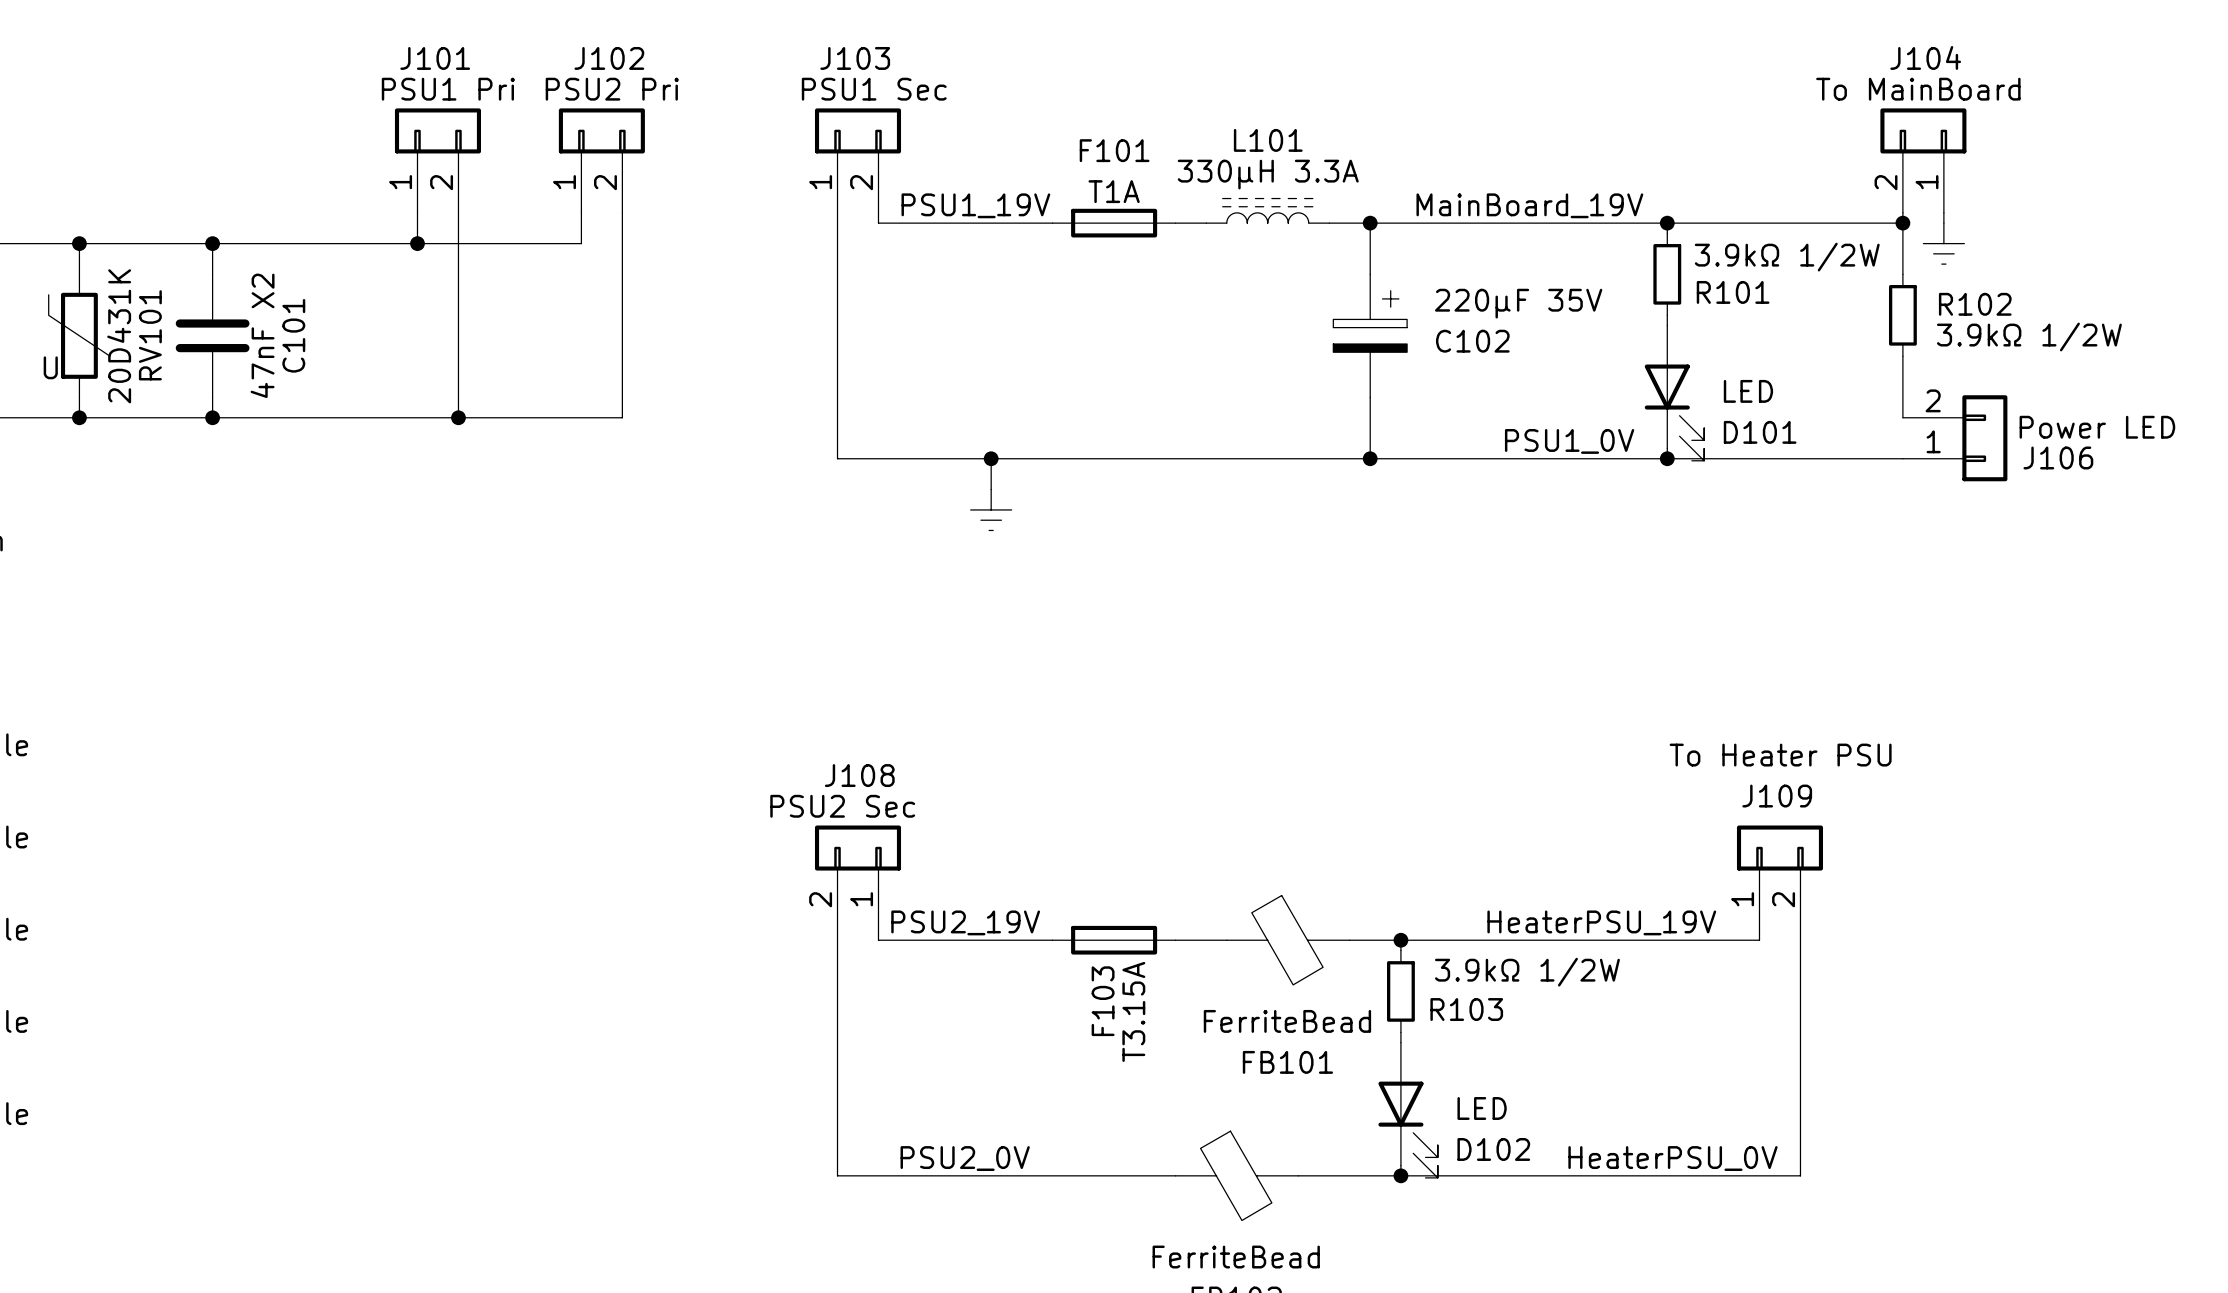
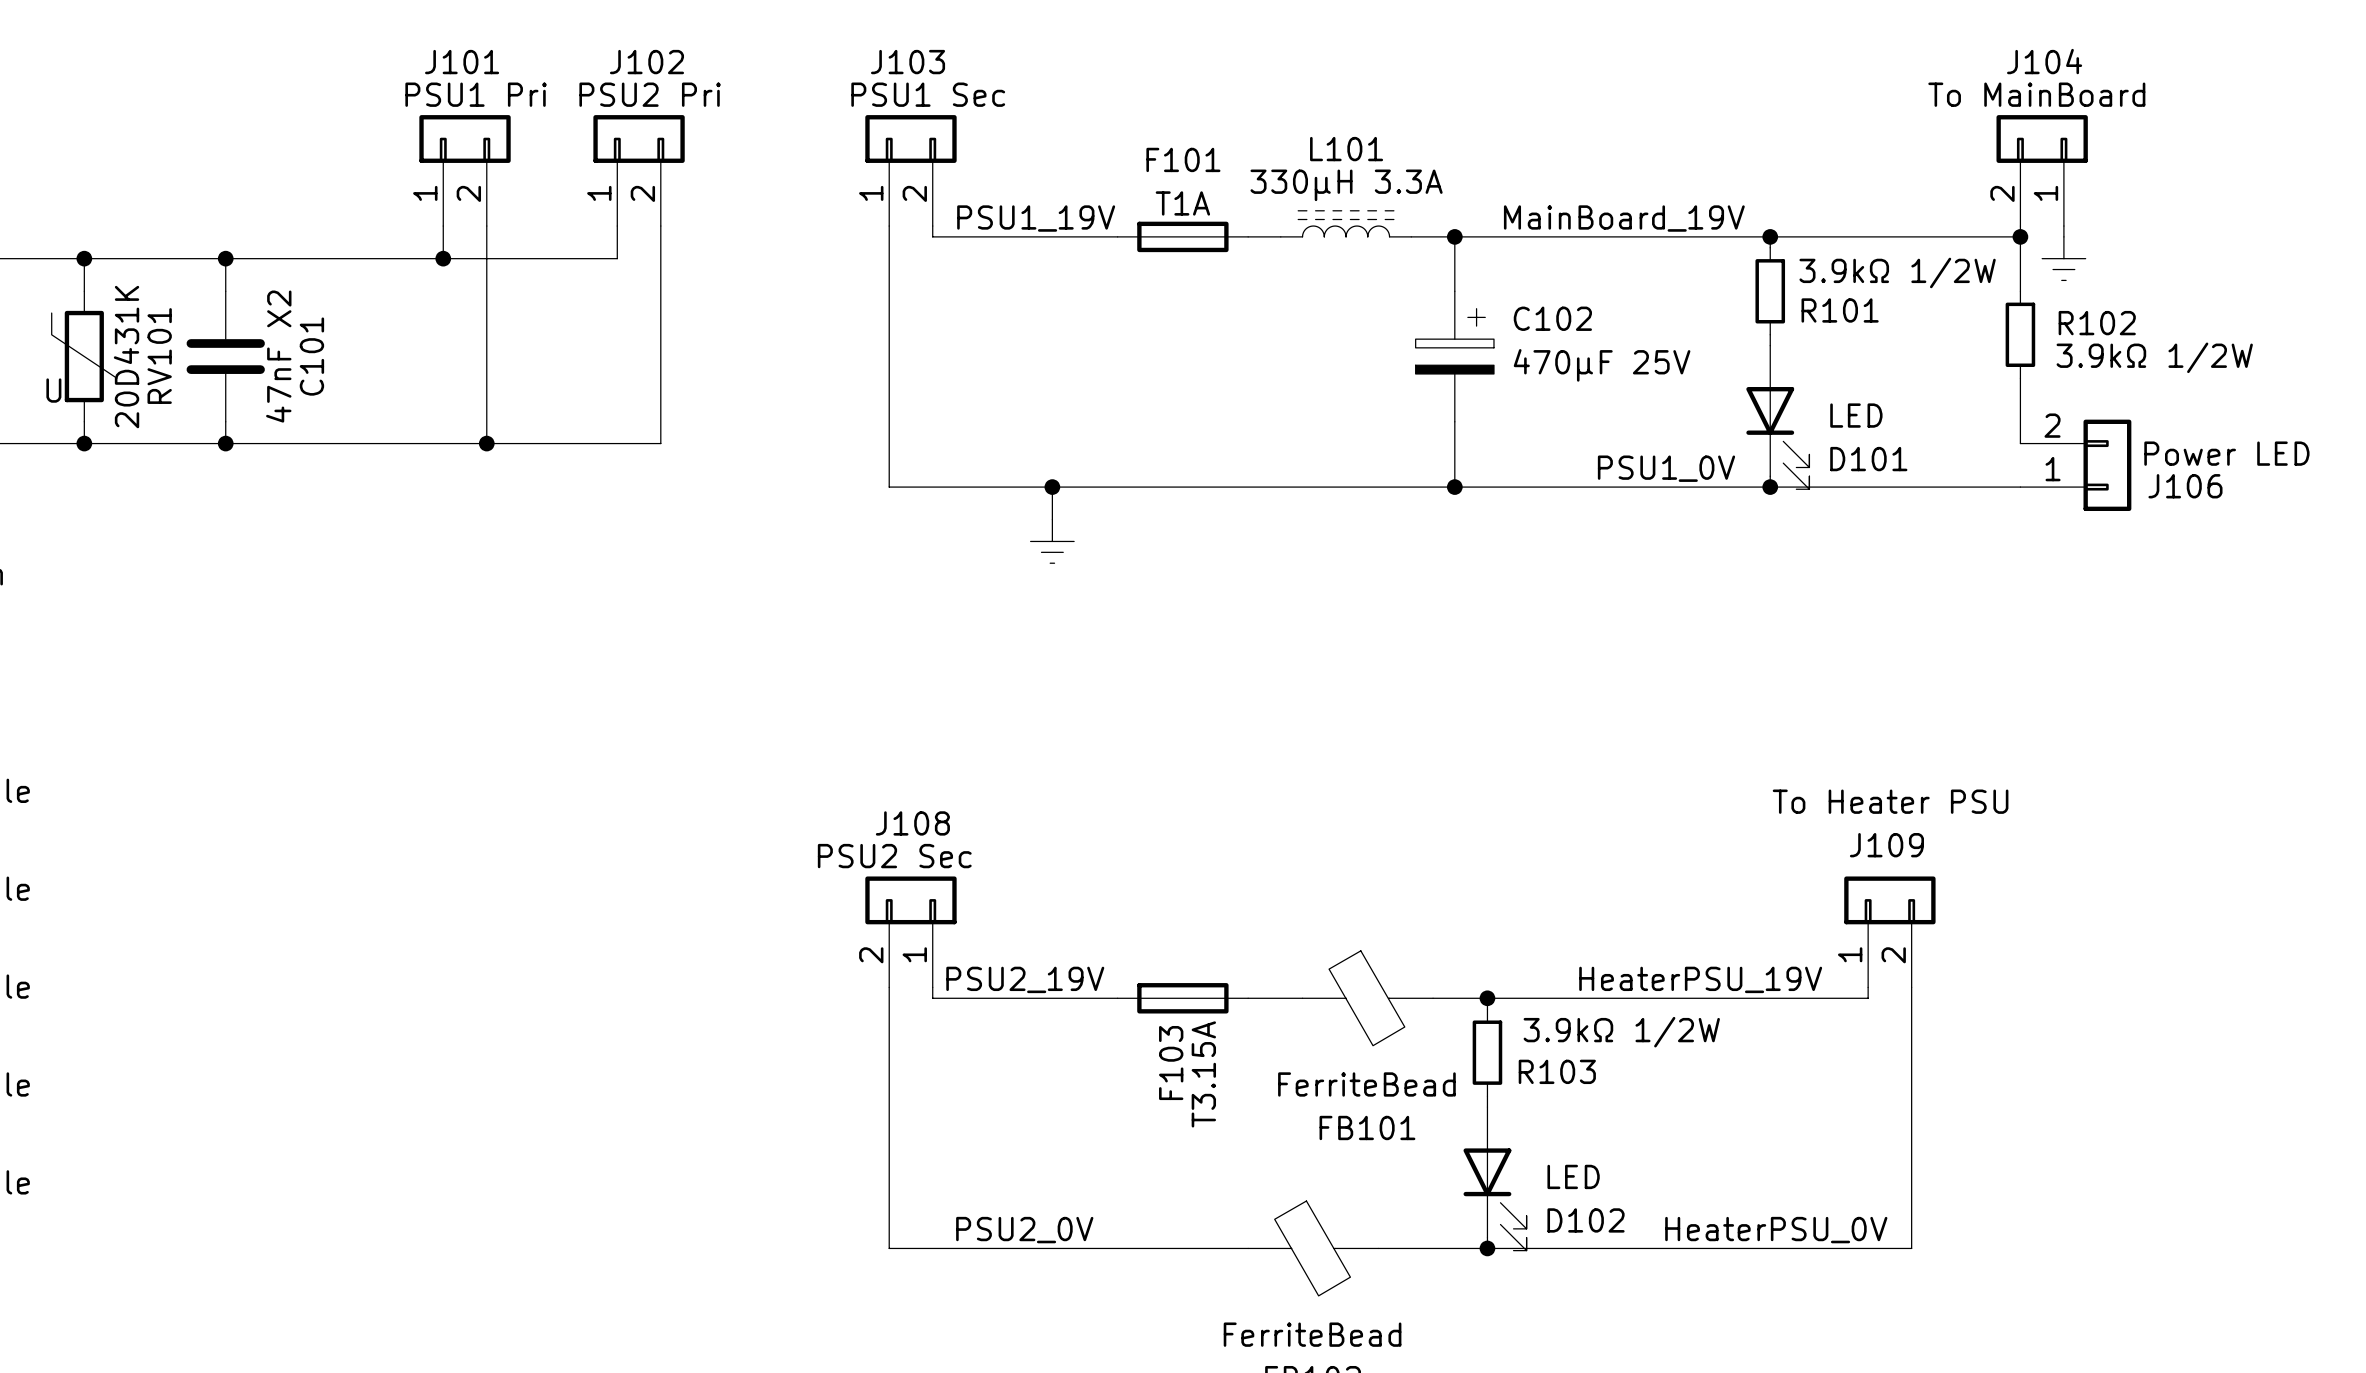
C102 value: 220µF 35V (1518, 303) -> 470µF 25V (1602, 365)
C102 name position: C102 (1472, 341) -> C102 (1552, 318)

